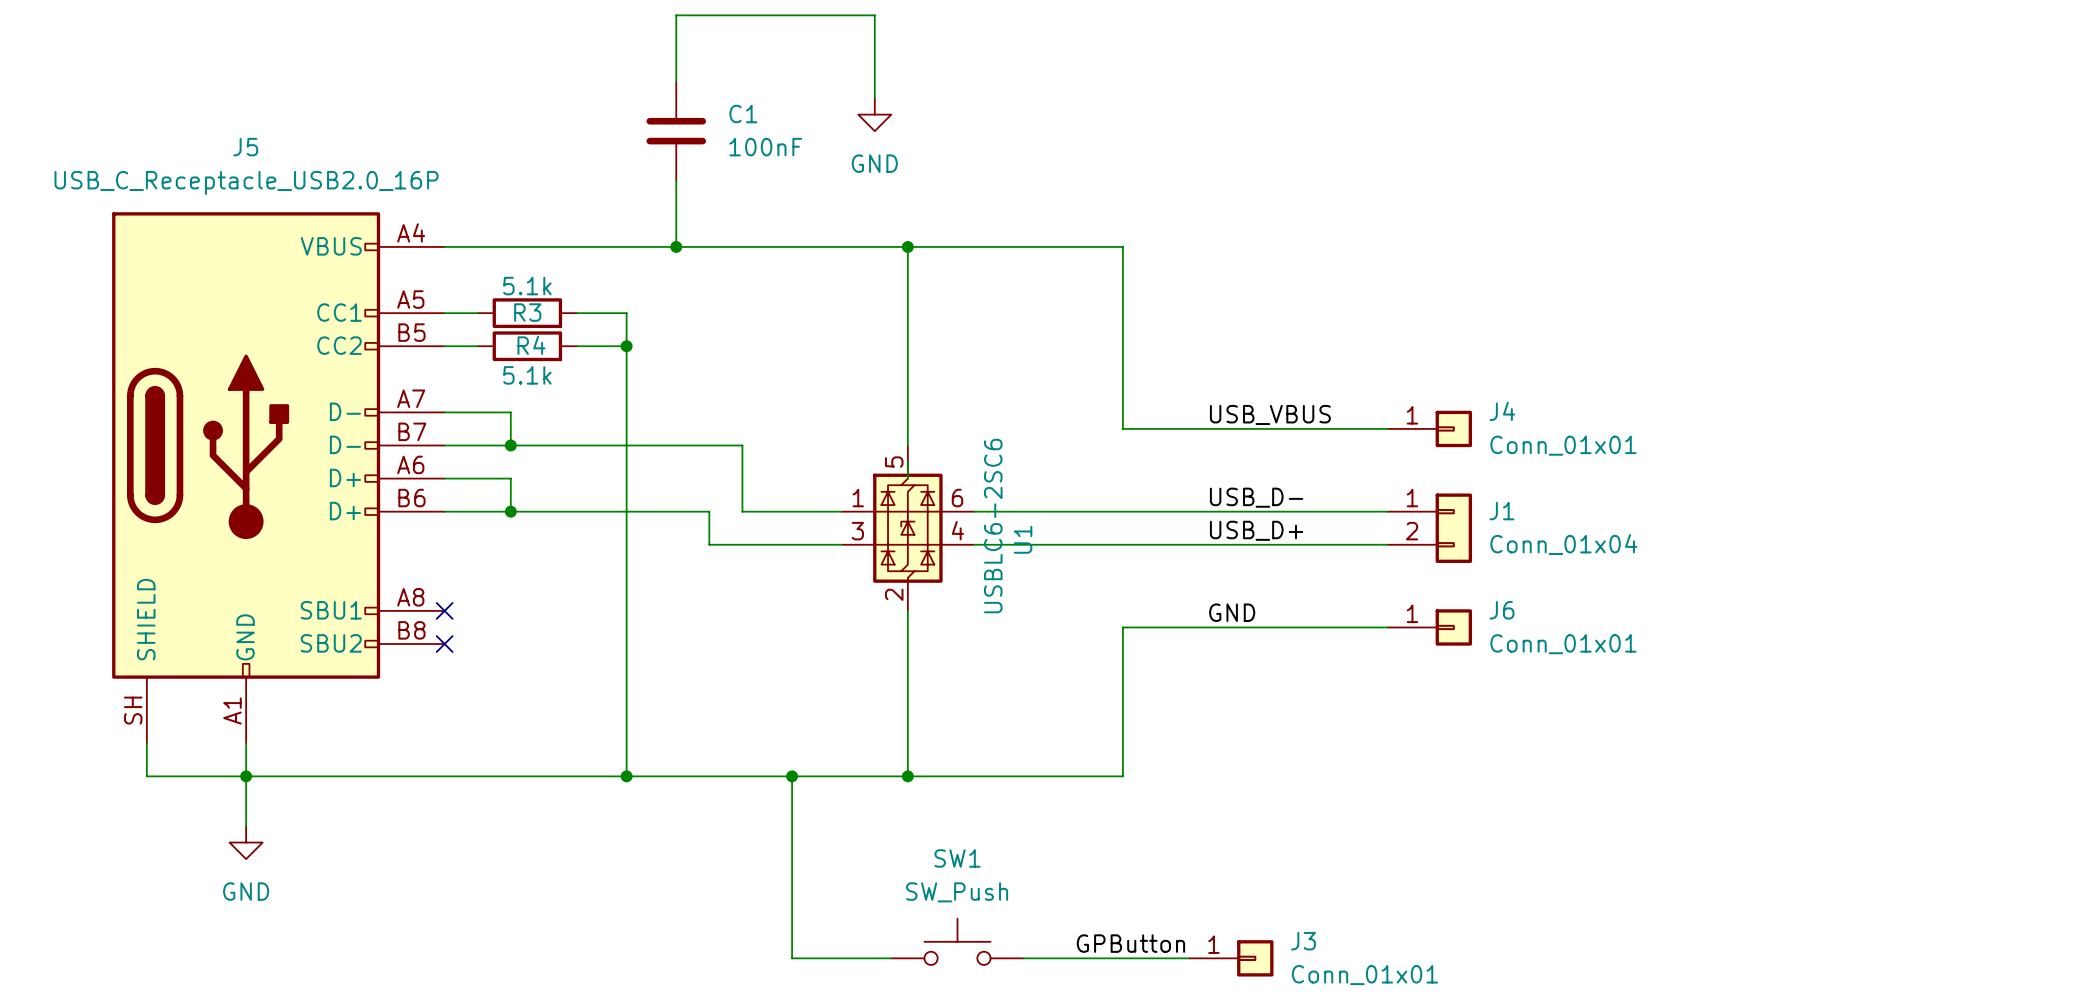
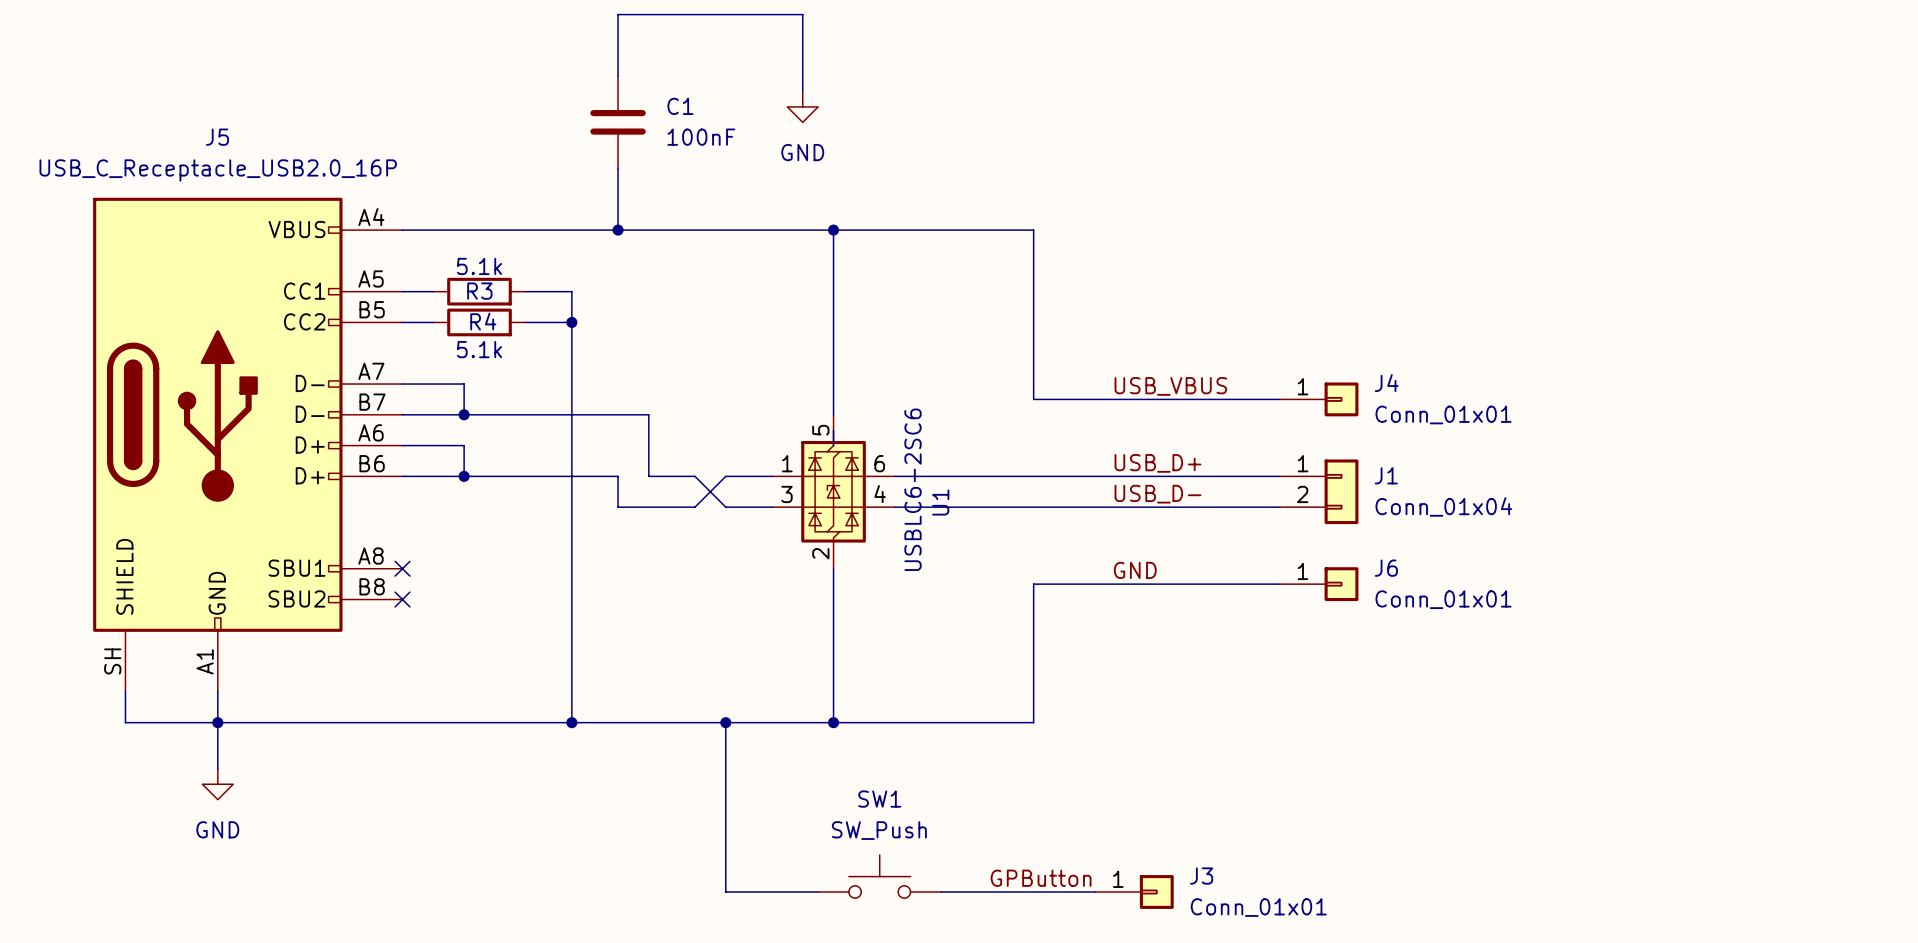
wire: (709, 445) (742, 445) (742, 511) -> (648, 414) (648, 476) (679, 476)
label: USB_D- (1256, 497) -> USB_D+ (1158, 463)
wire: (676, 511) (709, 511) (709, 544) -> (618, 476) (618, 507) (648, 507)
wire: (758, 511) (792, 511) -> (695, 476) (725, 507)
label: USB_D+ (1256, 530) -> USB_D- (1158, 494)
wire: (758, 544) (792, 544) -> (695, 507) (725, 476)

